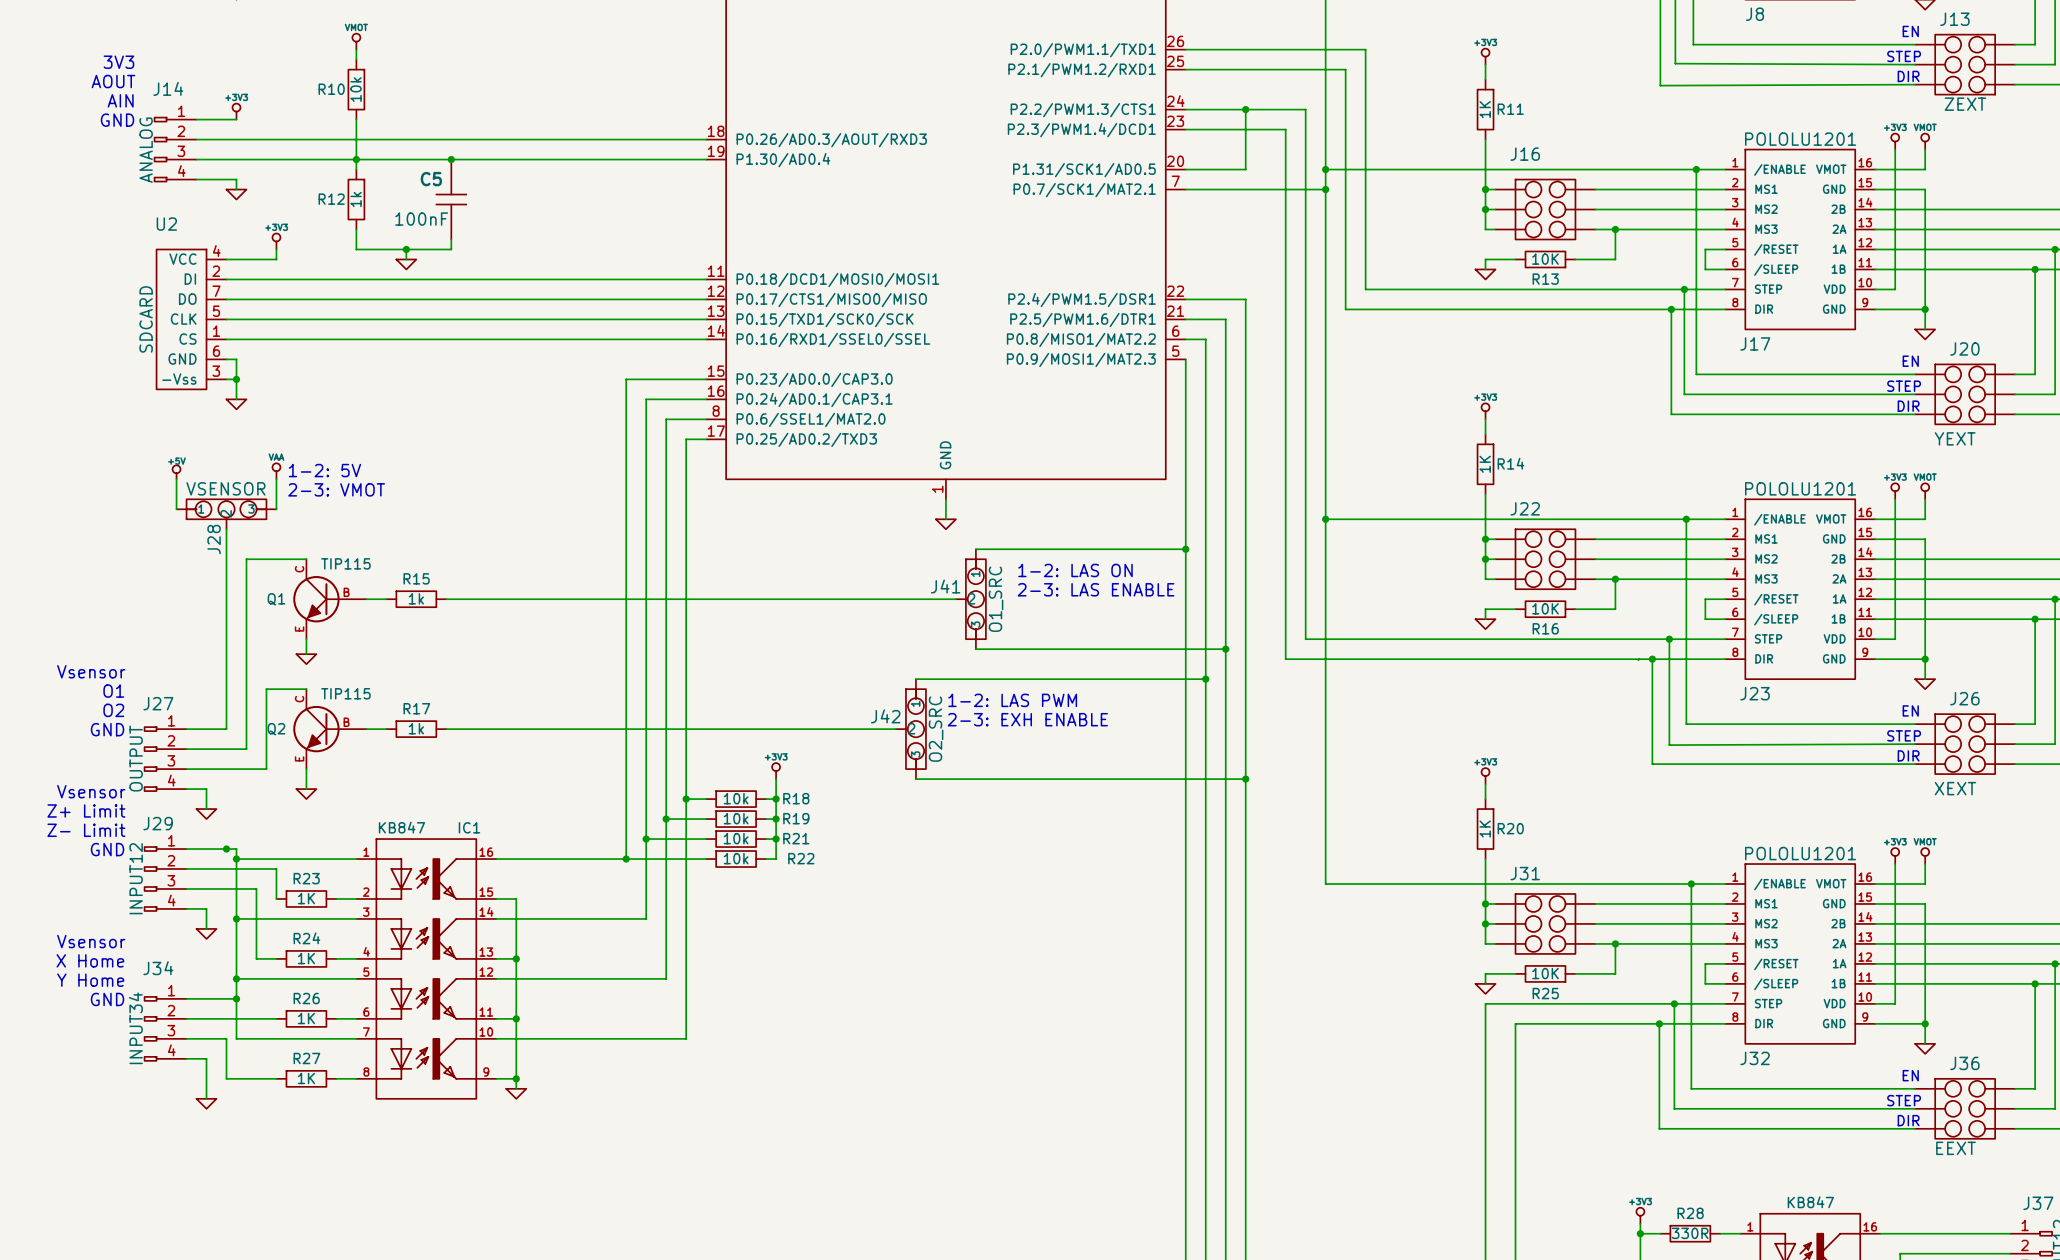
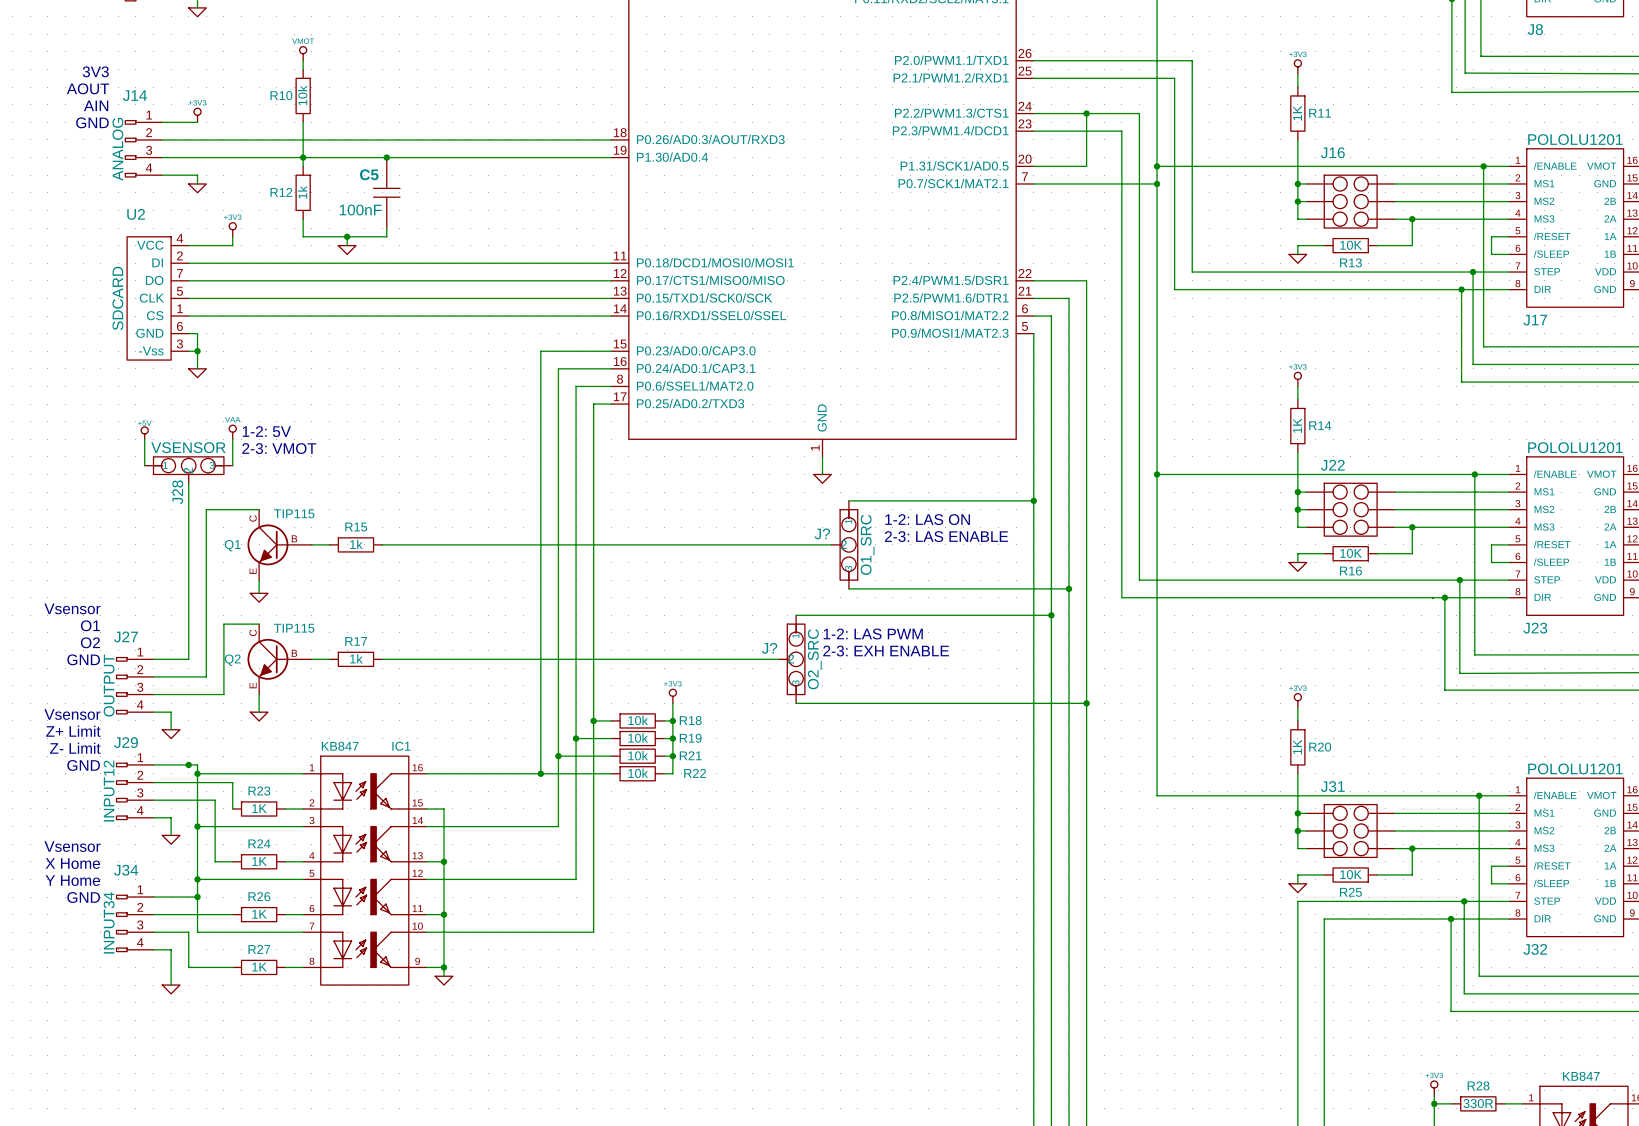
J41 name: J41 (945, 586) -> J? (822, 533)
J42 name: J42 (885, 716) -> J? (769, 648)

